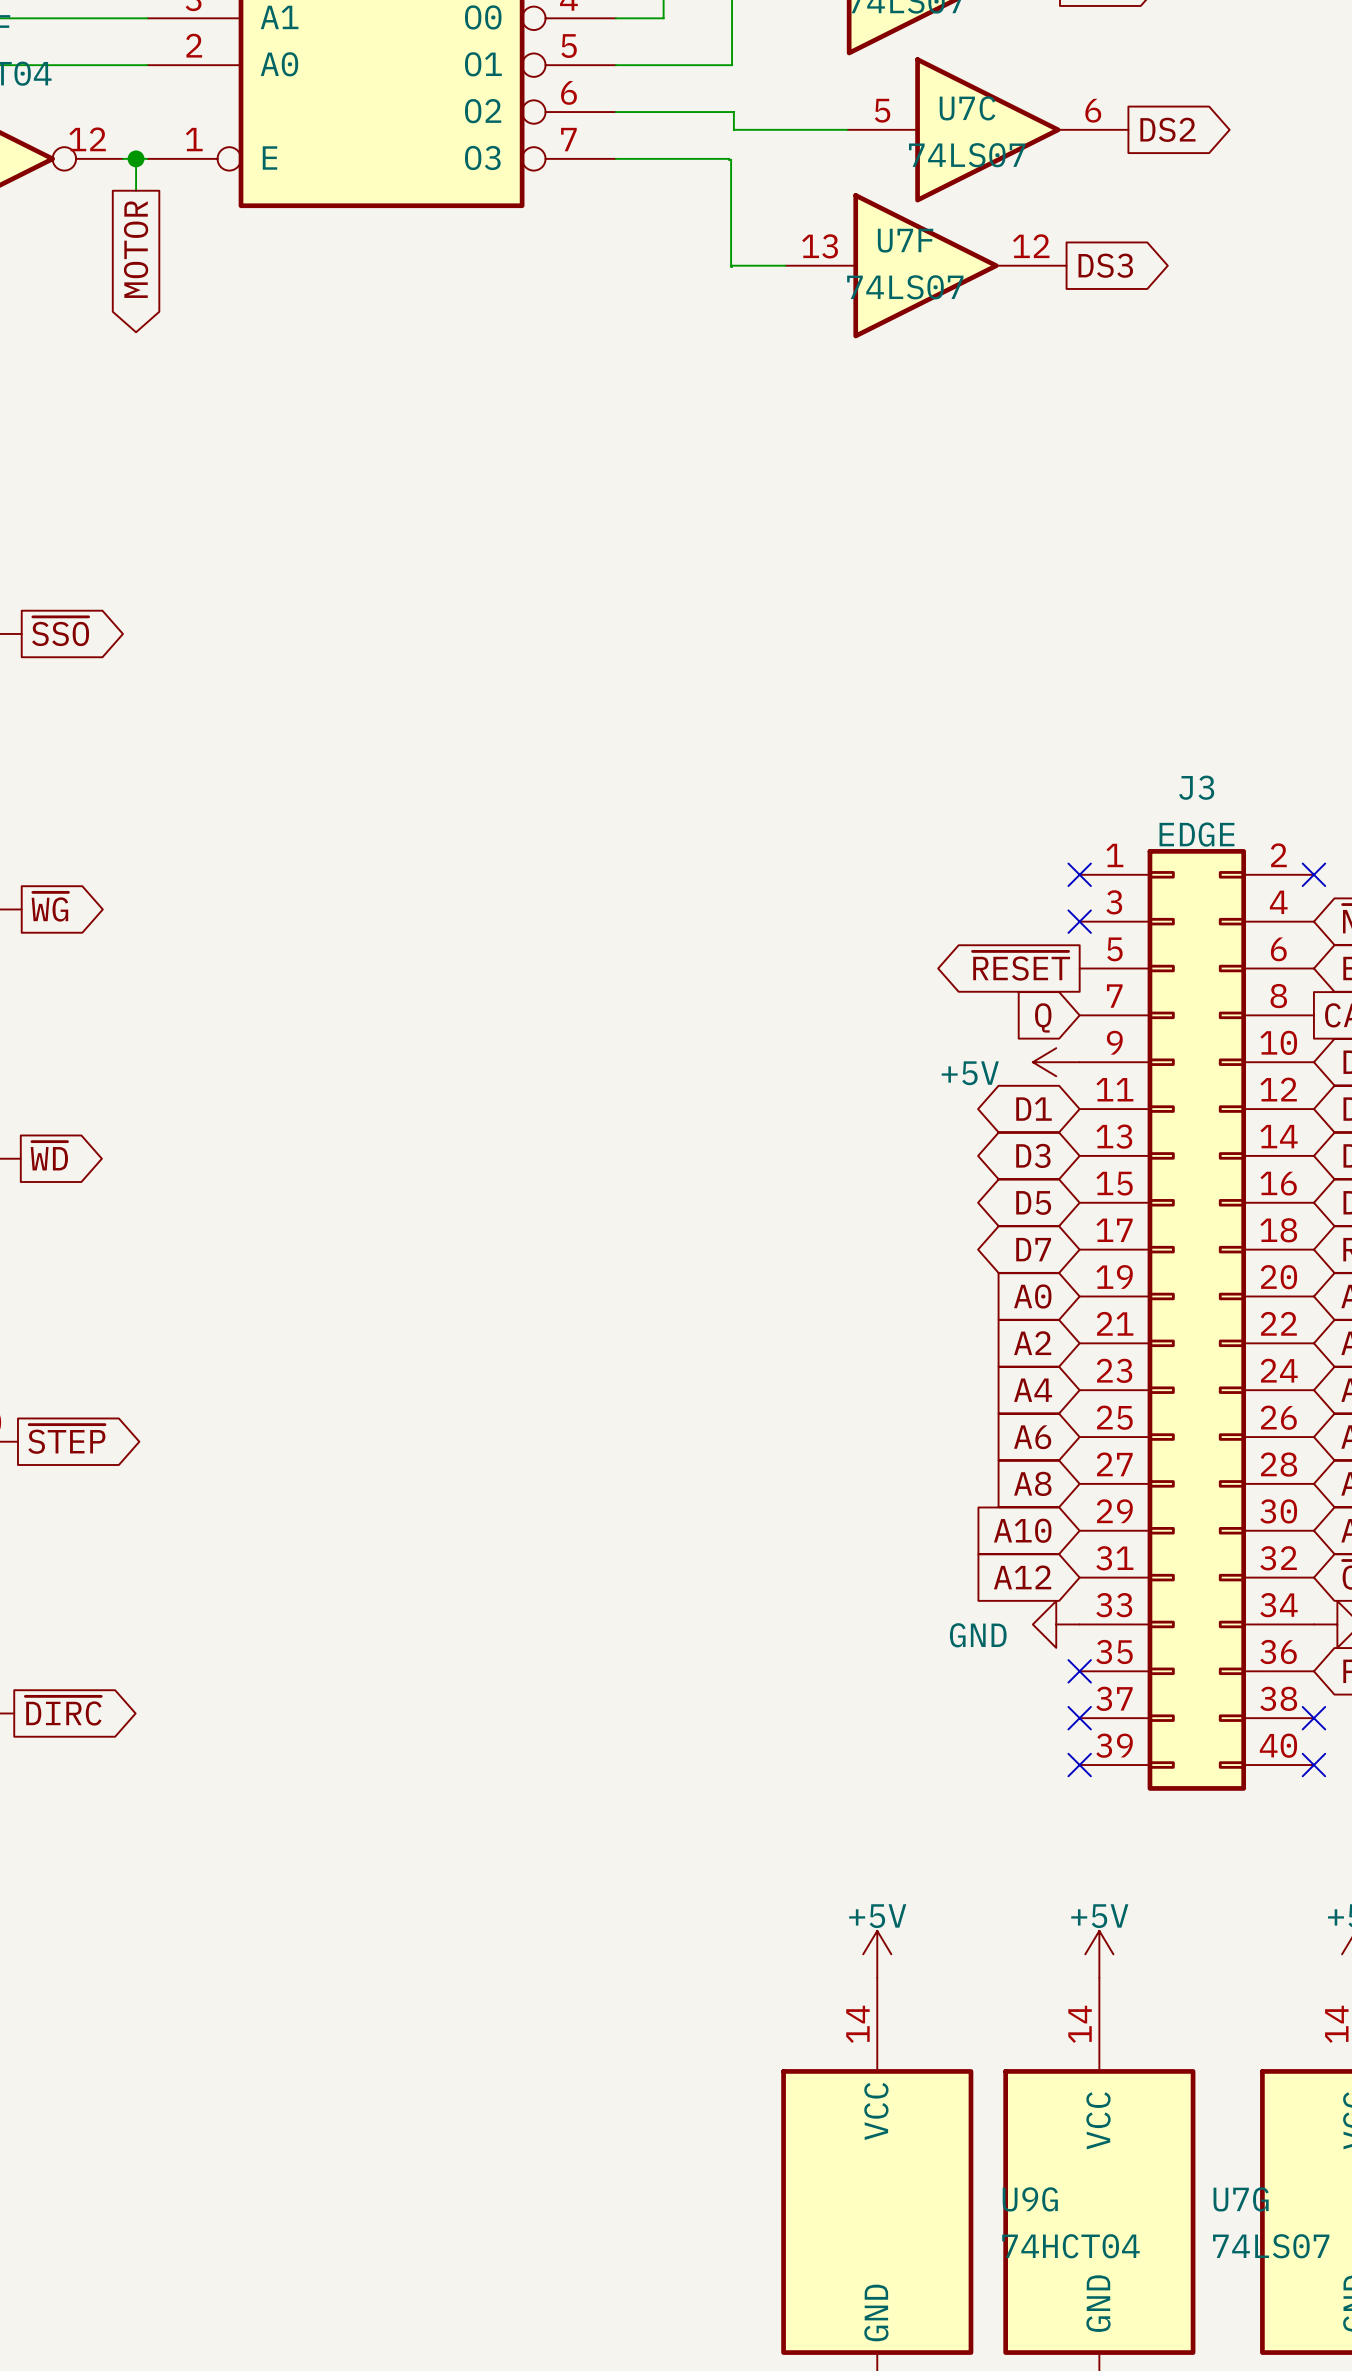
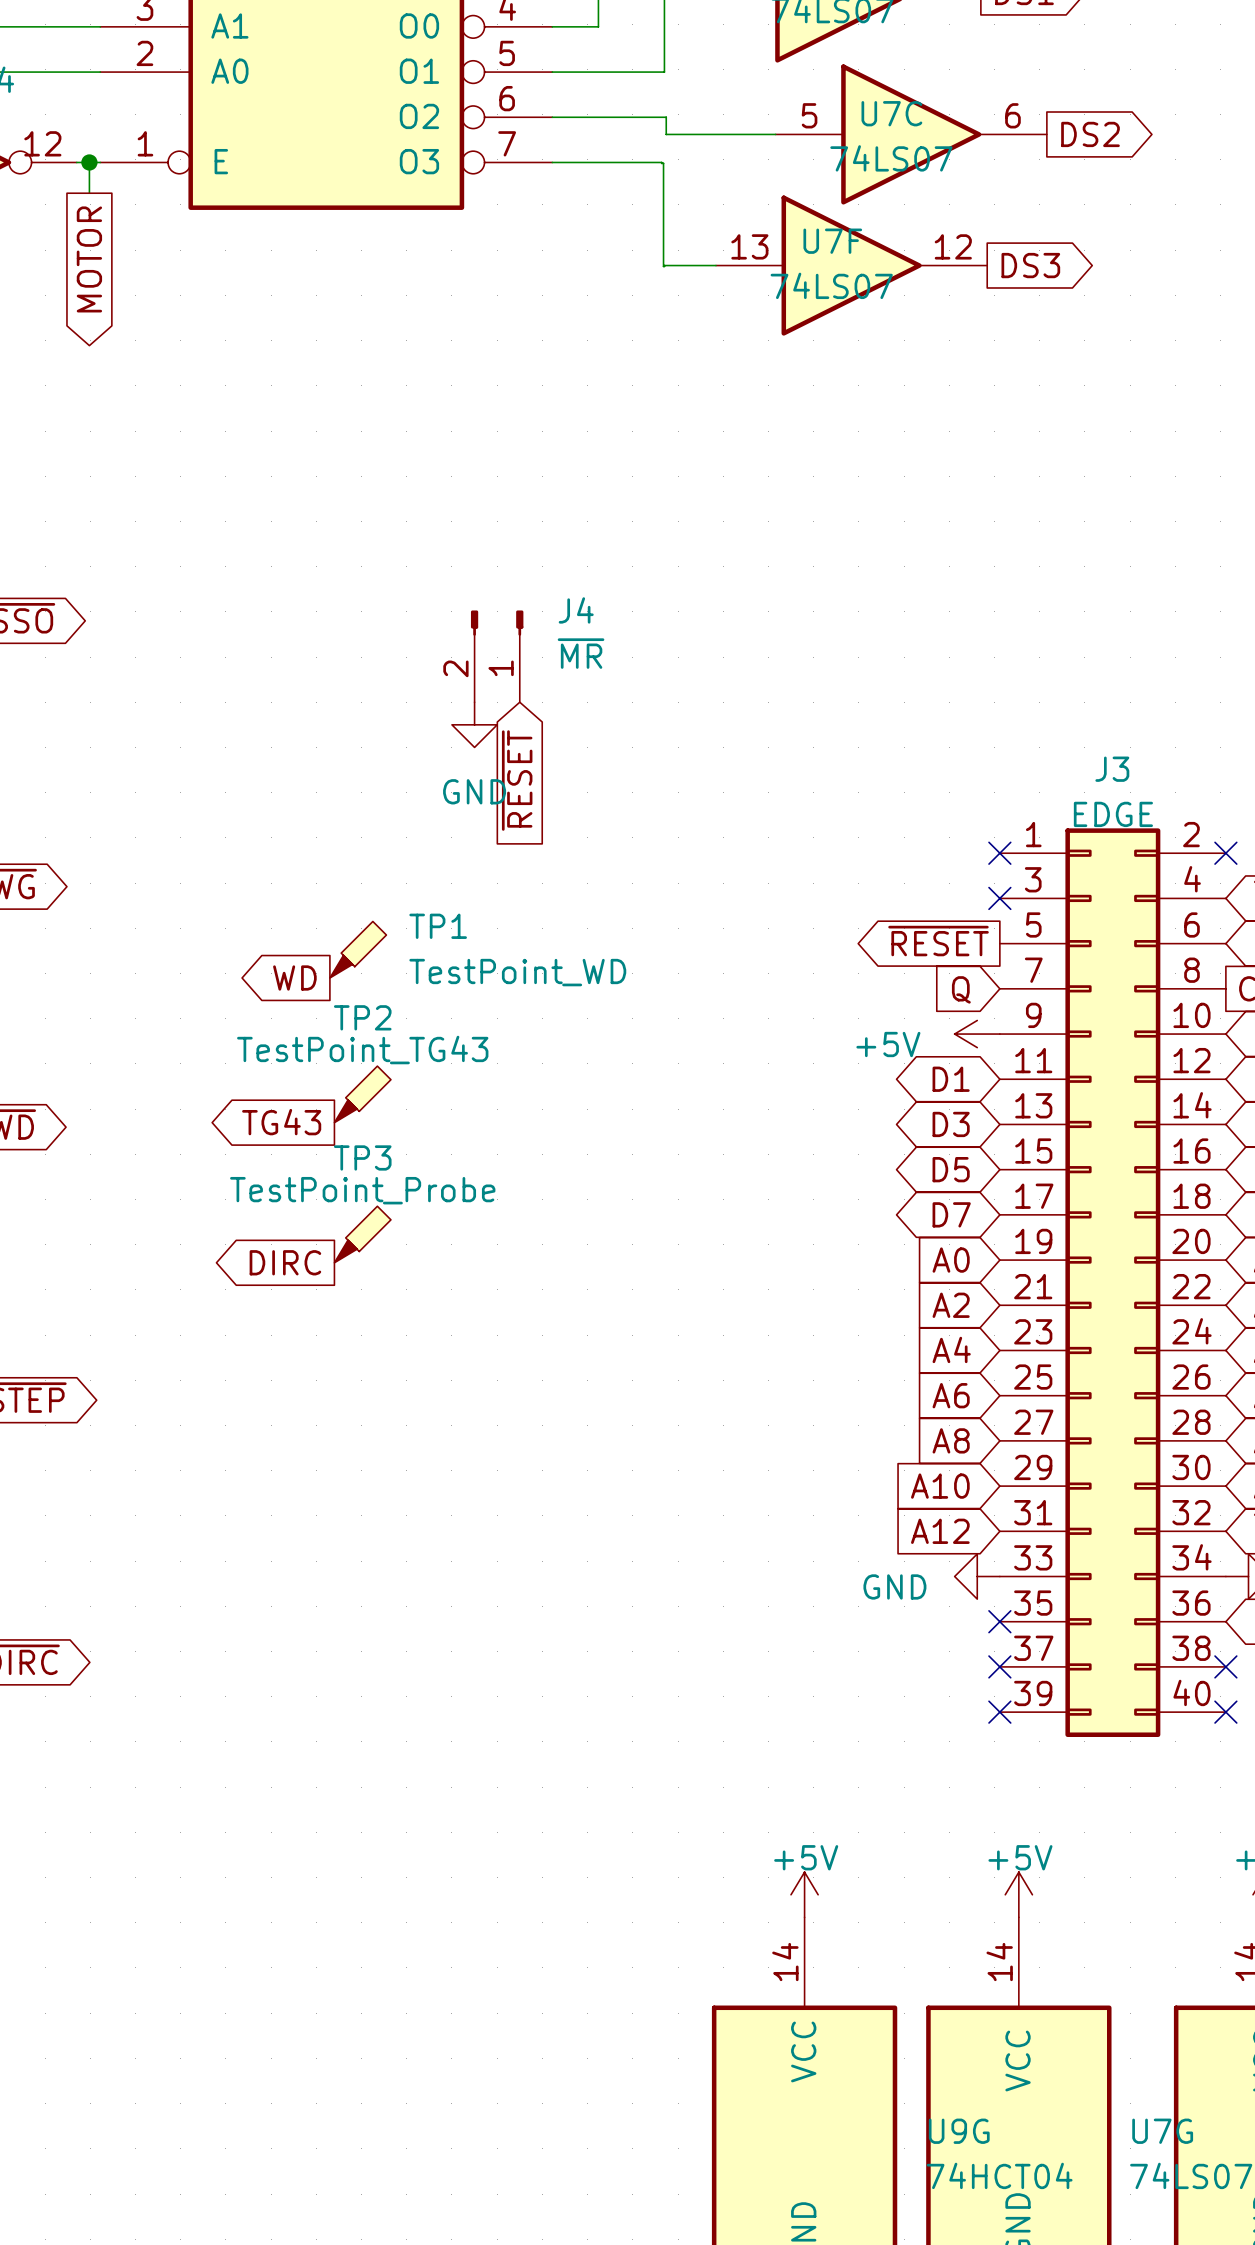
J4: none -> ~{MR} (497, 656)
power symbol: none -> GND (474, 724)
global label: none -> ~{RESET} (517, 780)
TP1: none -> TestPoint_WD (358, 949)
global label: none -> WD (294, 977)
TP2: none -> TestPoint_TG43 (362, 1094)
global label: none -> TG43 (281, 1122)
TP3: none -> TestPoint_Probe (362, 1234)
global label: none -> DIRC (285, 1262)

